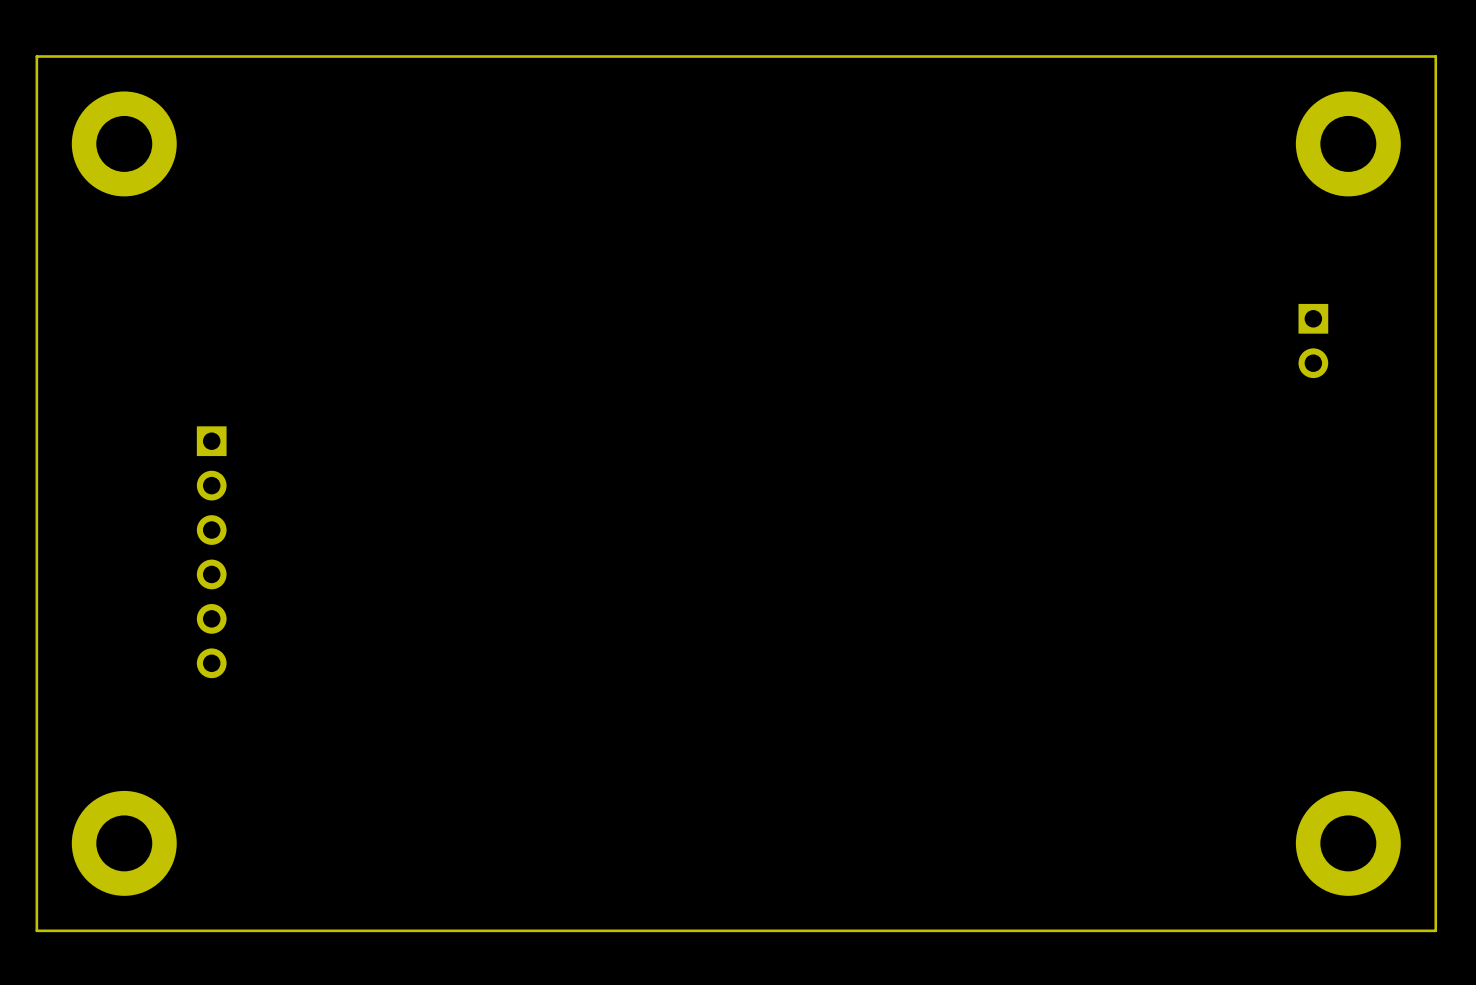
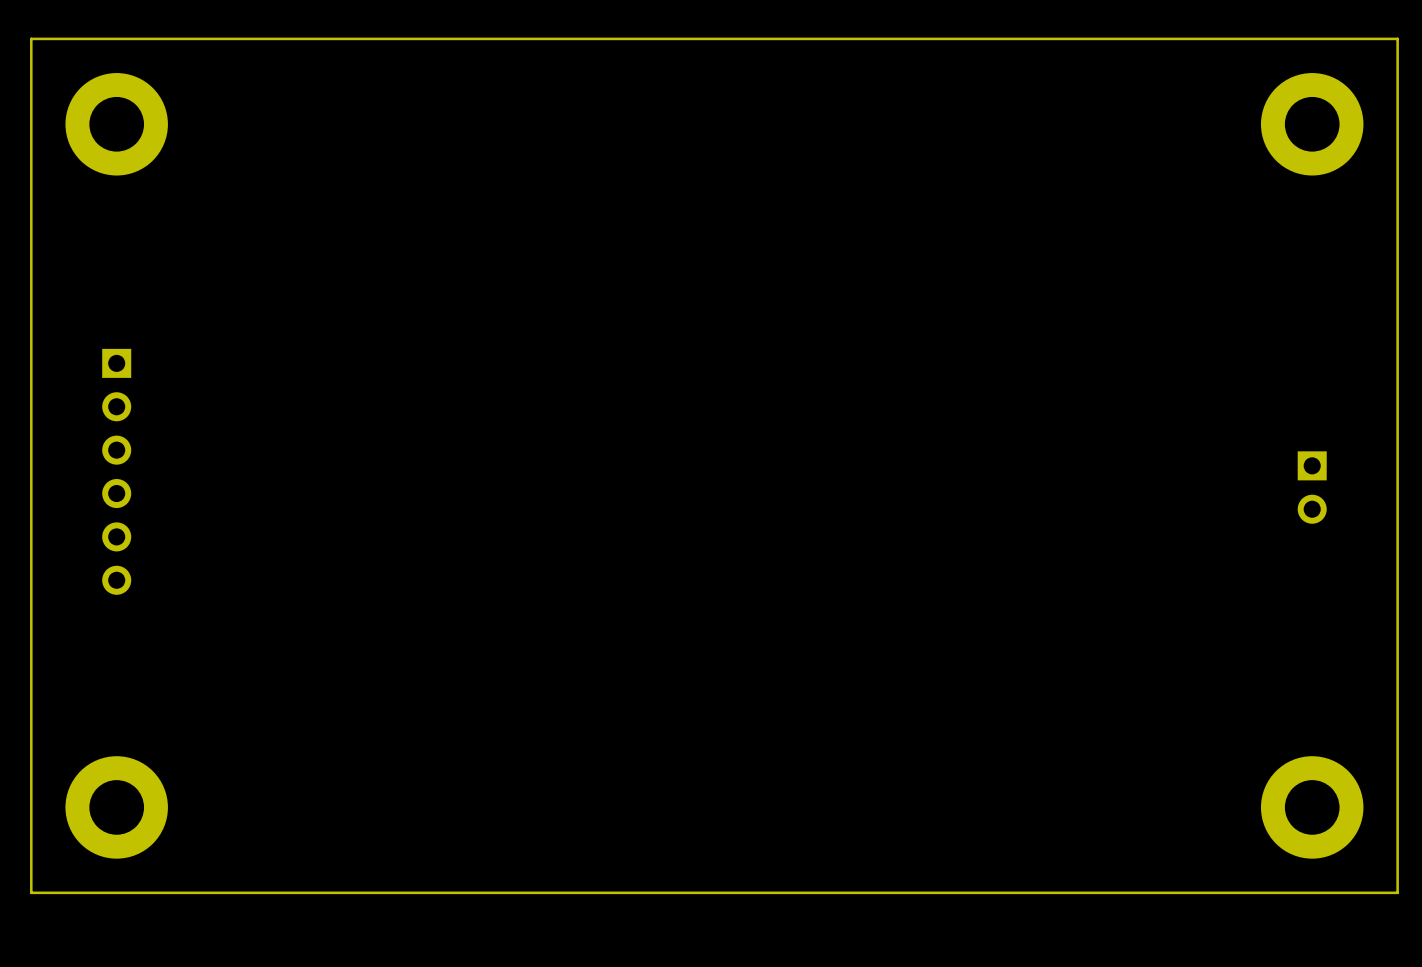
part position: (1313, 341) -> (1312, 487)
part position: (211, 552) -> (116, 471)

